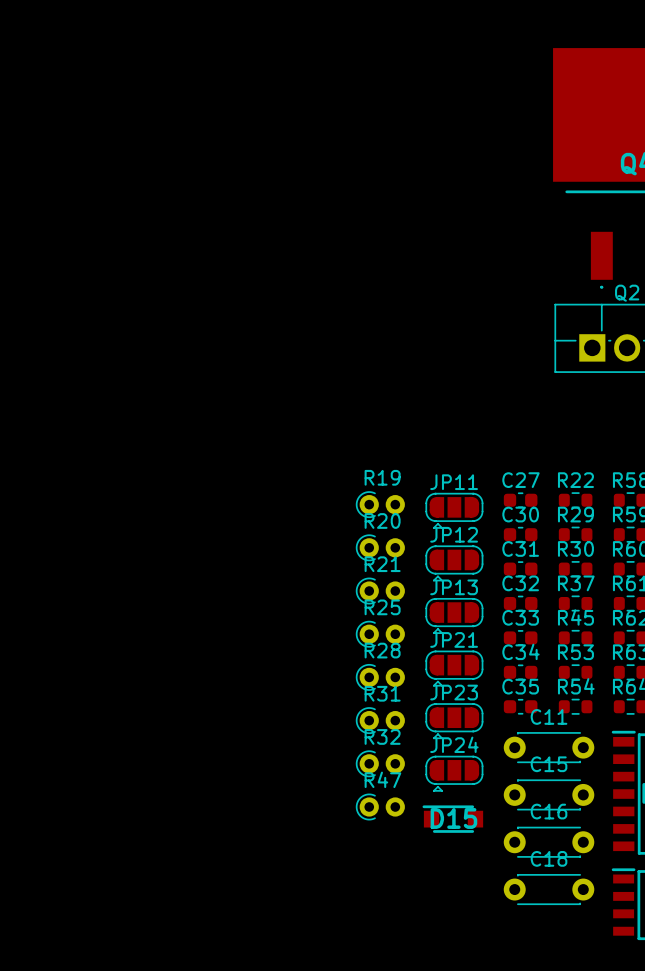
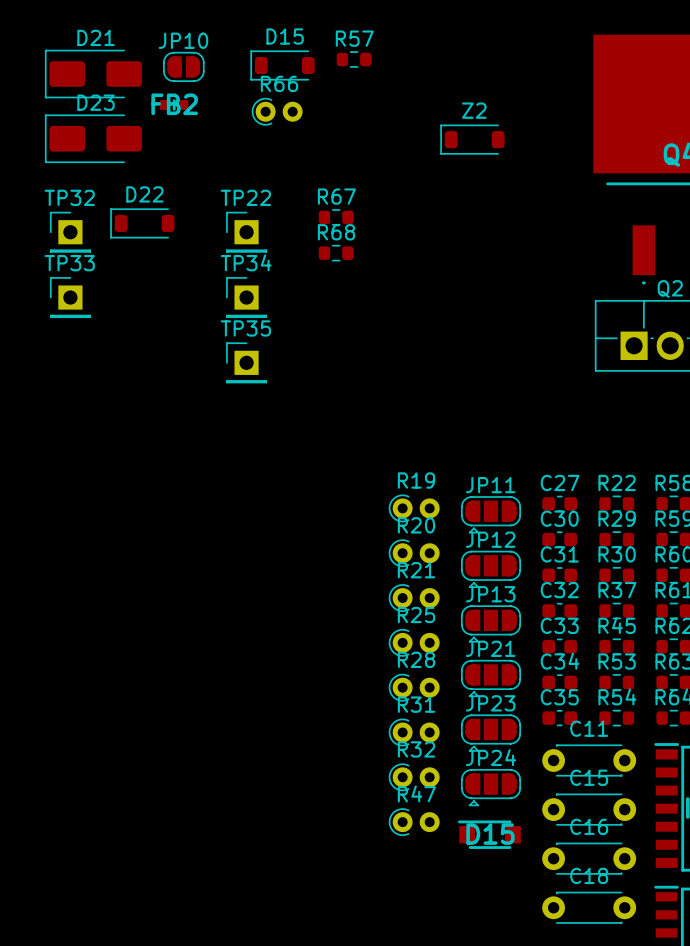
R57: none -> (354, 59)
D15: none -> (282, 65)
JP10: none -> (183, 66)
D21: none -> (93, 74)
FB2: none -> (174, 104)
R66: none -> (277, 111)
D23: none -> (93, 138)
Z2: none -> (472, 139)
R67: none -> (336, 217)
D22: none -> (142, 223)
TP32: none -> (70, 232)
TP22: none -> (246, 232)
R68: none -> (336, 253)
TP33: none -> (70, 297)
TP34: none -> (246, 297)
TP35: none -> (246, 362)

